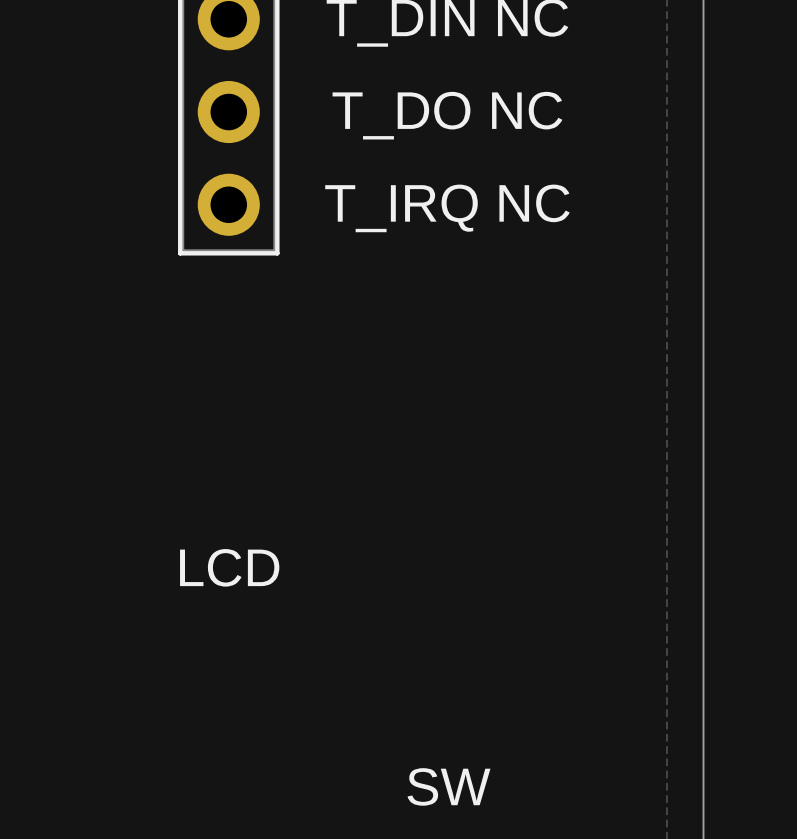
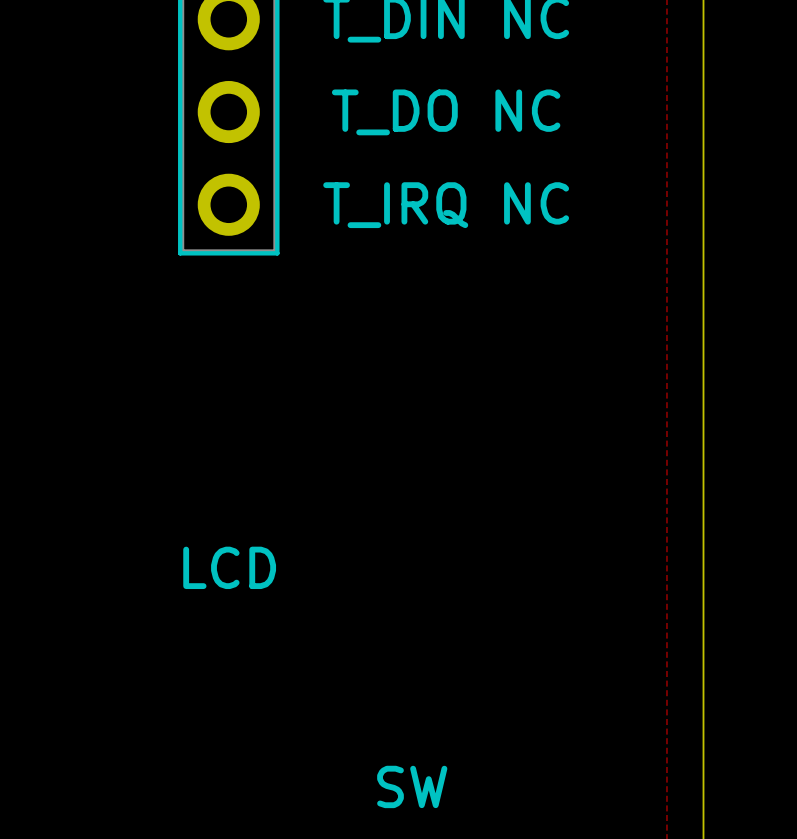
text position: SW (449, 786) -> SW (412, 786)

